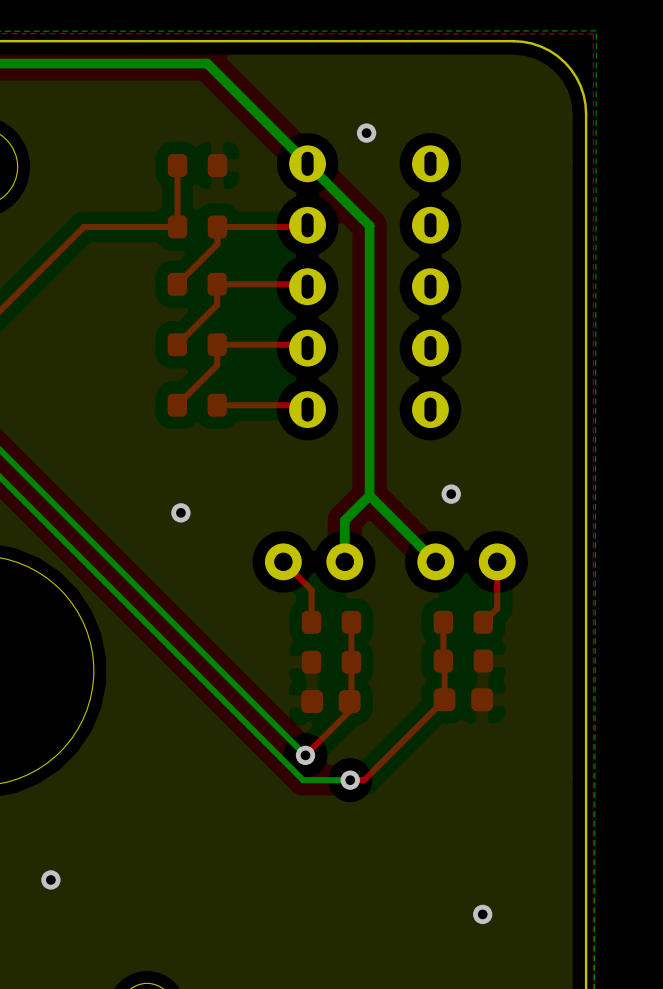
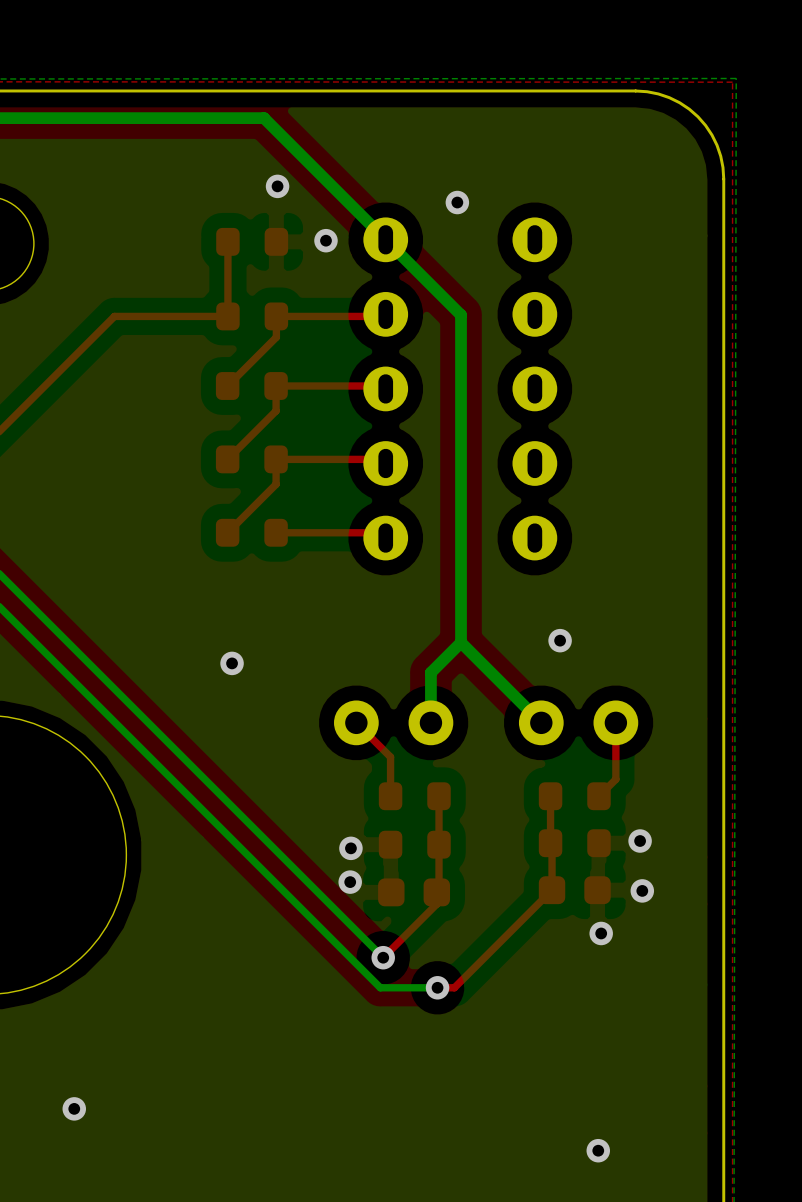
via: none -> (277, 186)
via: none -> (325, 240)
via: none -> (640, 841)
via: none -> (350, 848)
via: none -> (350, 882)
via: none -> (642, 890)
via: none -> (601, 933)

